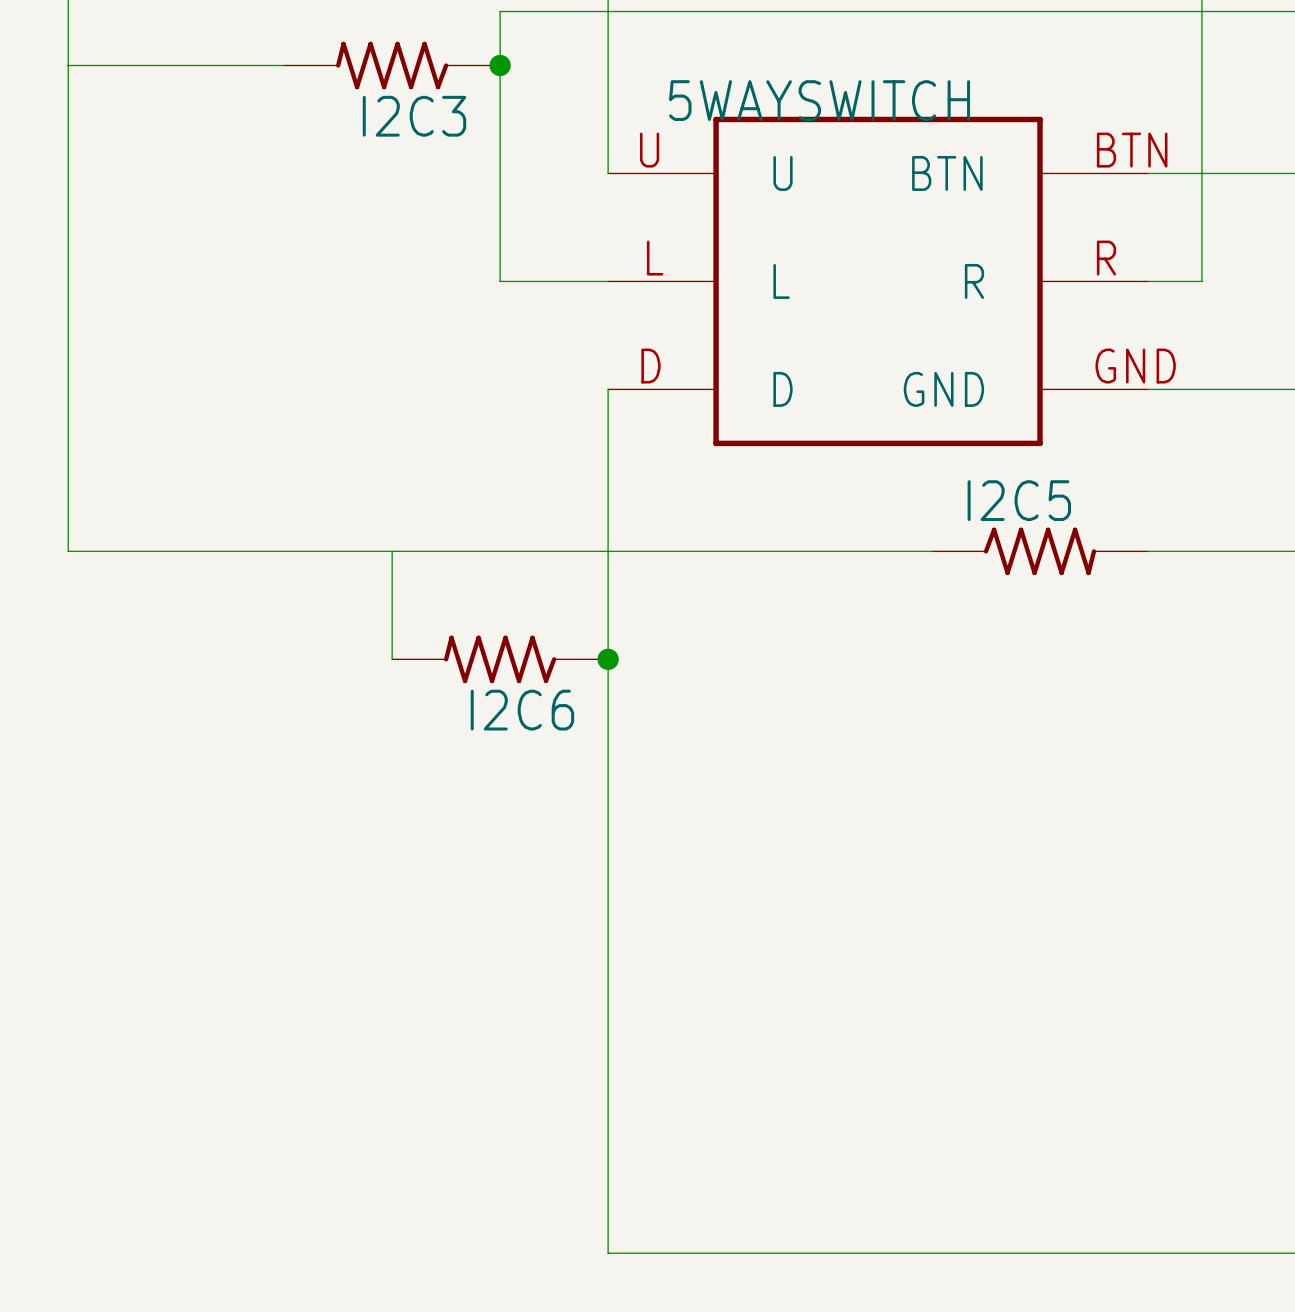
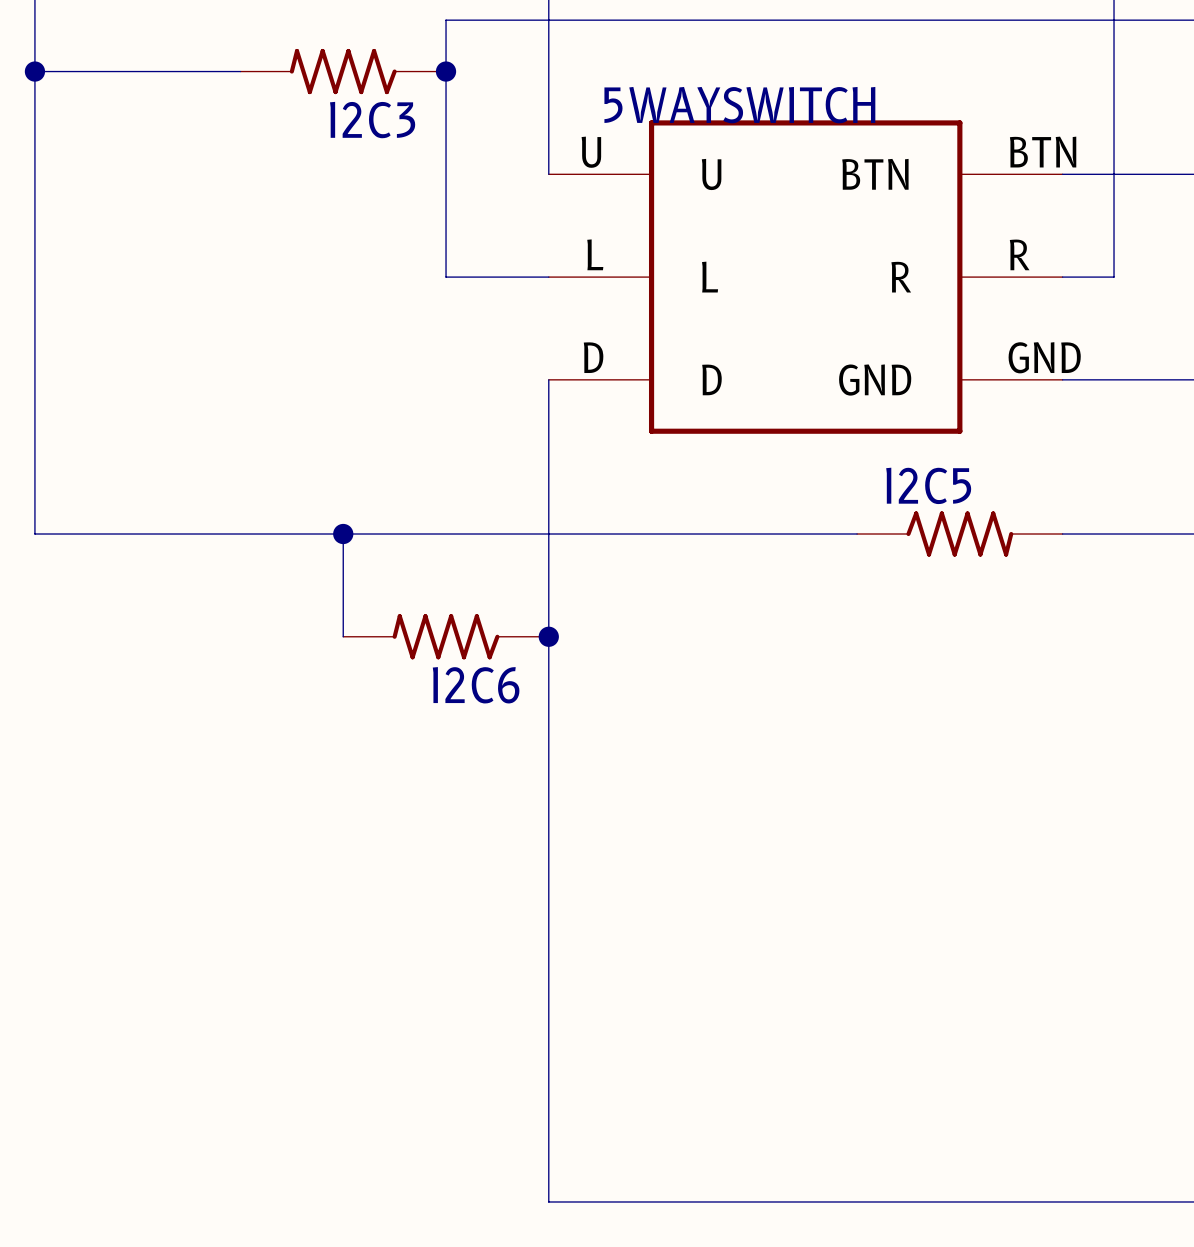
junction: none -> (34, 71)
junction: none -> (343, 534)

